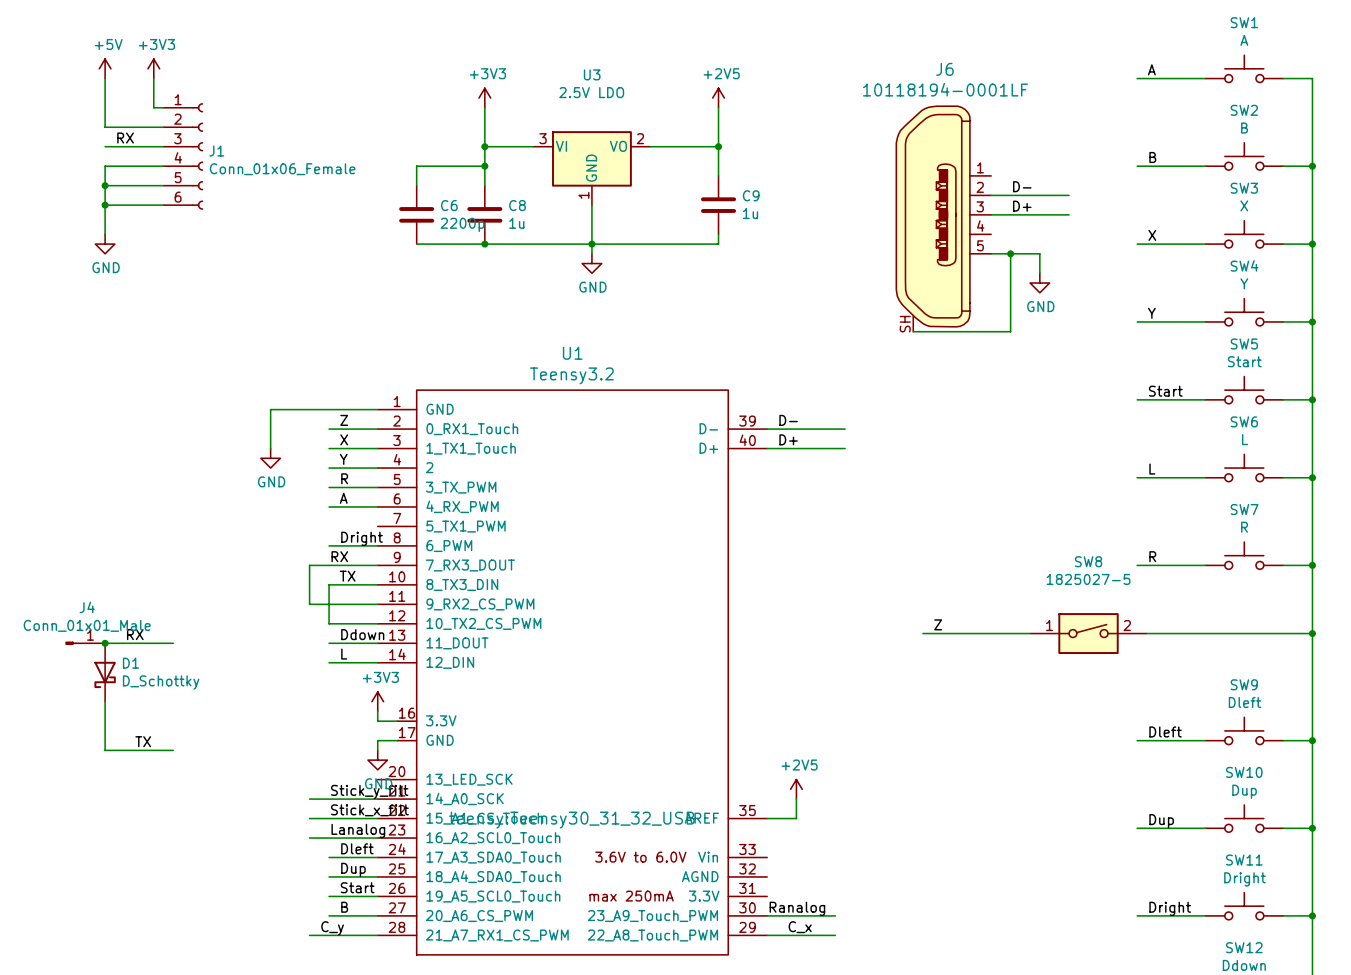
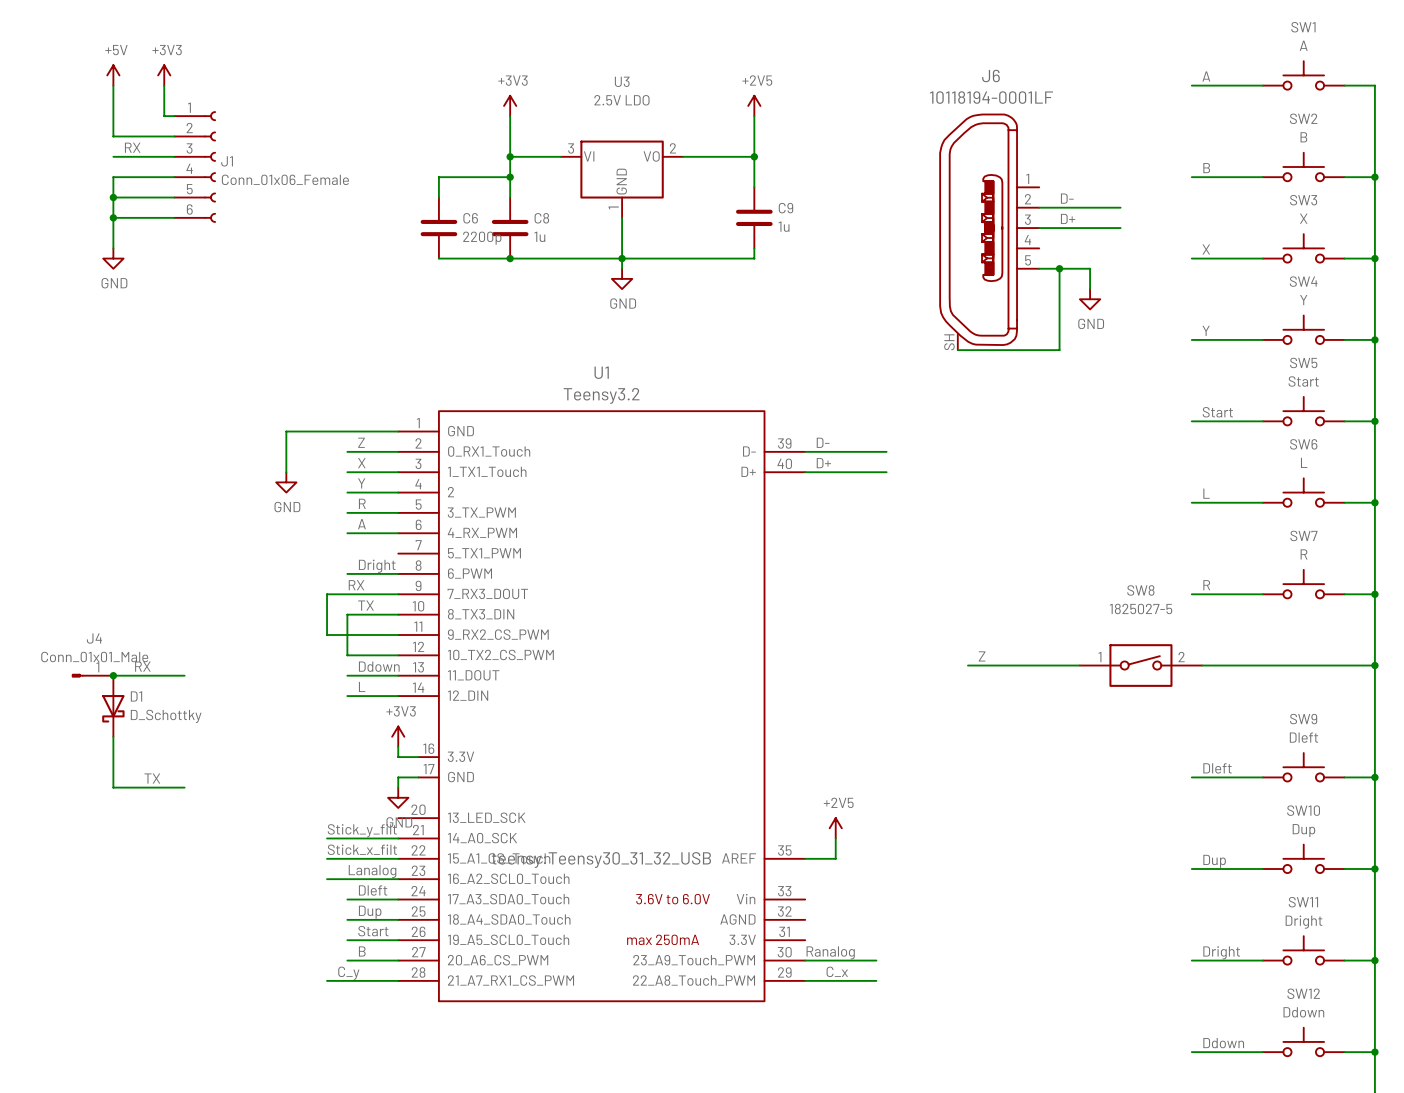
label position: Stick_y_filt (369, 792) -> Stick_y_filt (362, 830)
label position: Stick_x_filt (369, 810) -> Stick_x_filt (362, 849)

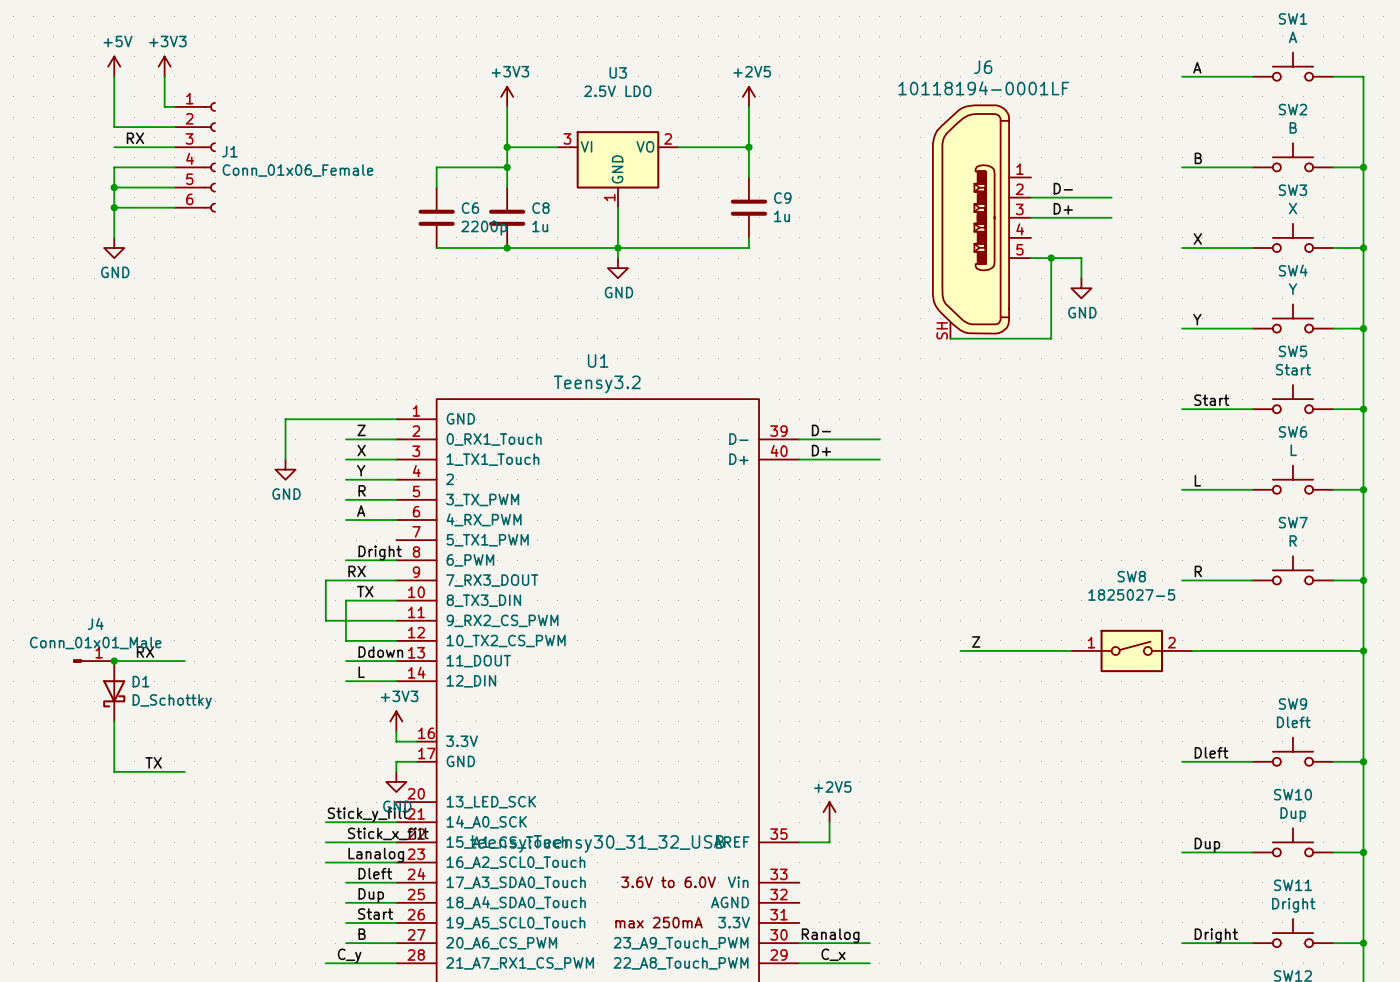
label position: Stick_x_filt (362, 849) -> Stick_x_filt (388, 833)

